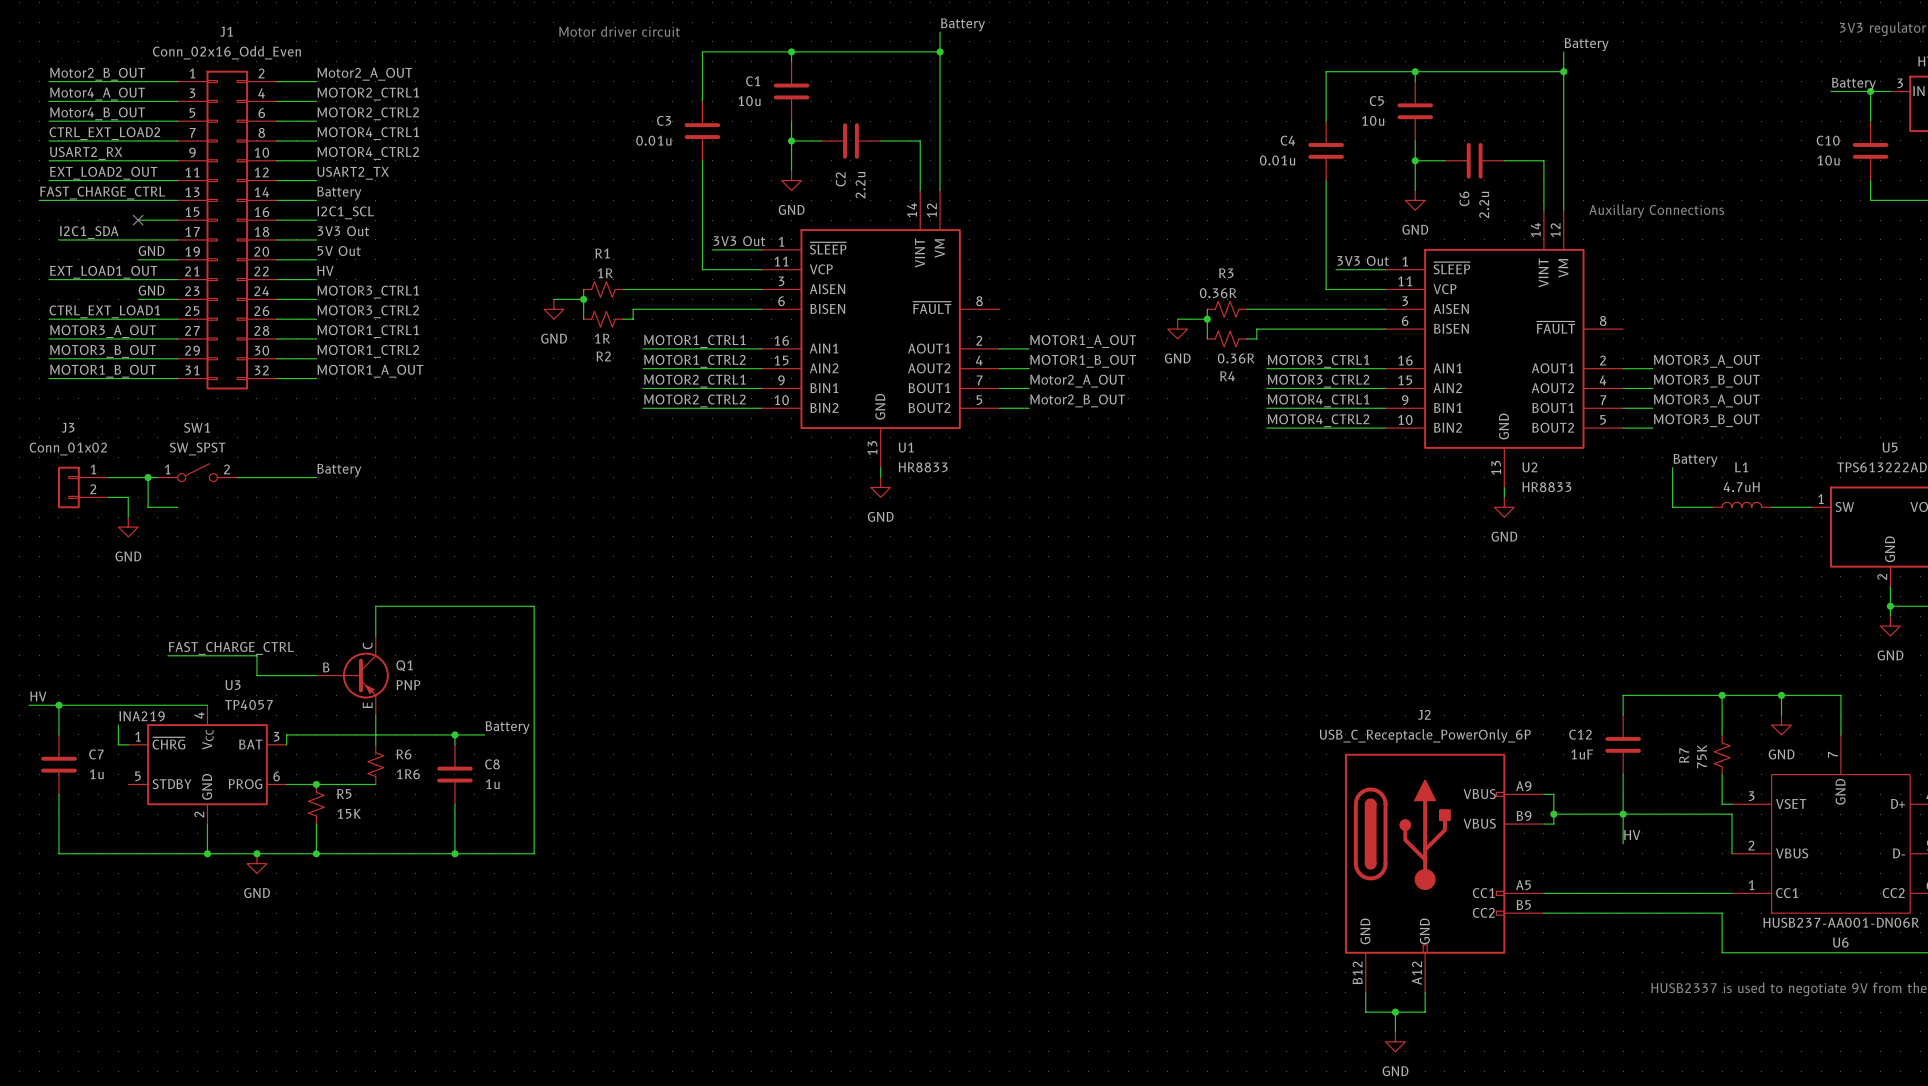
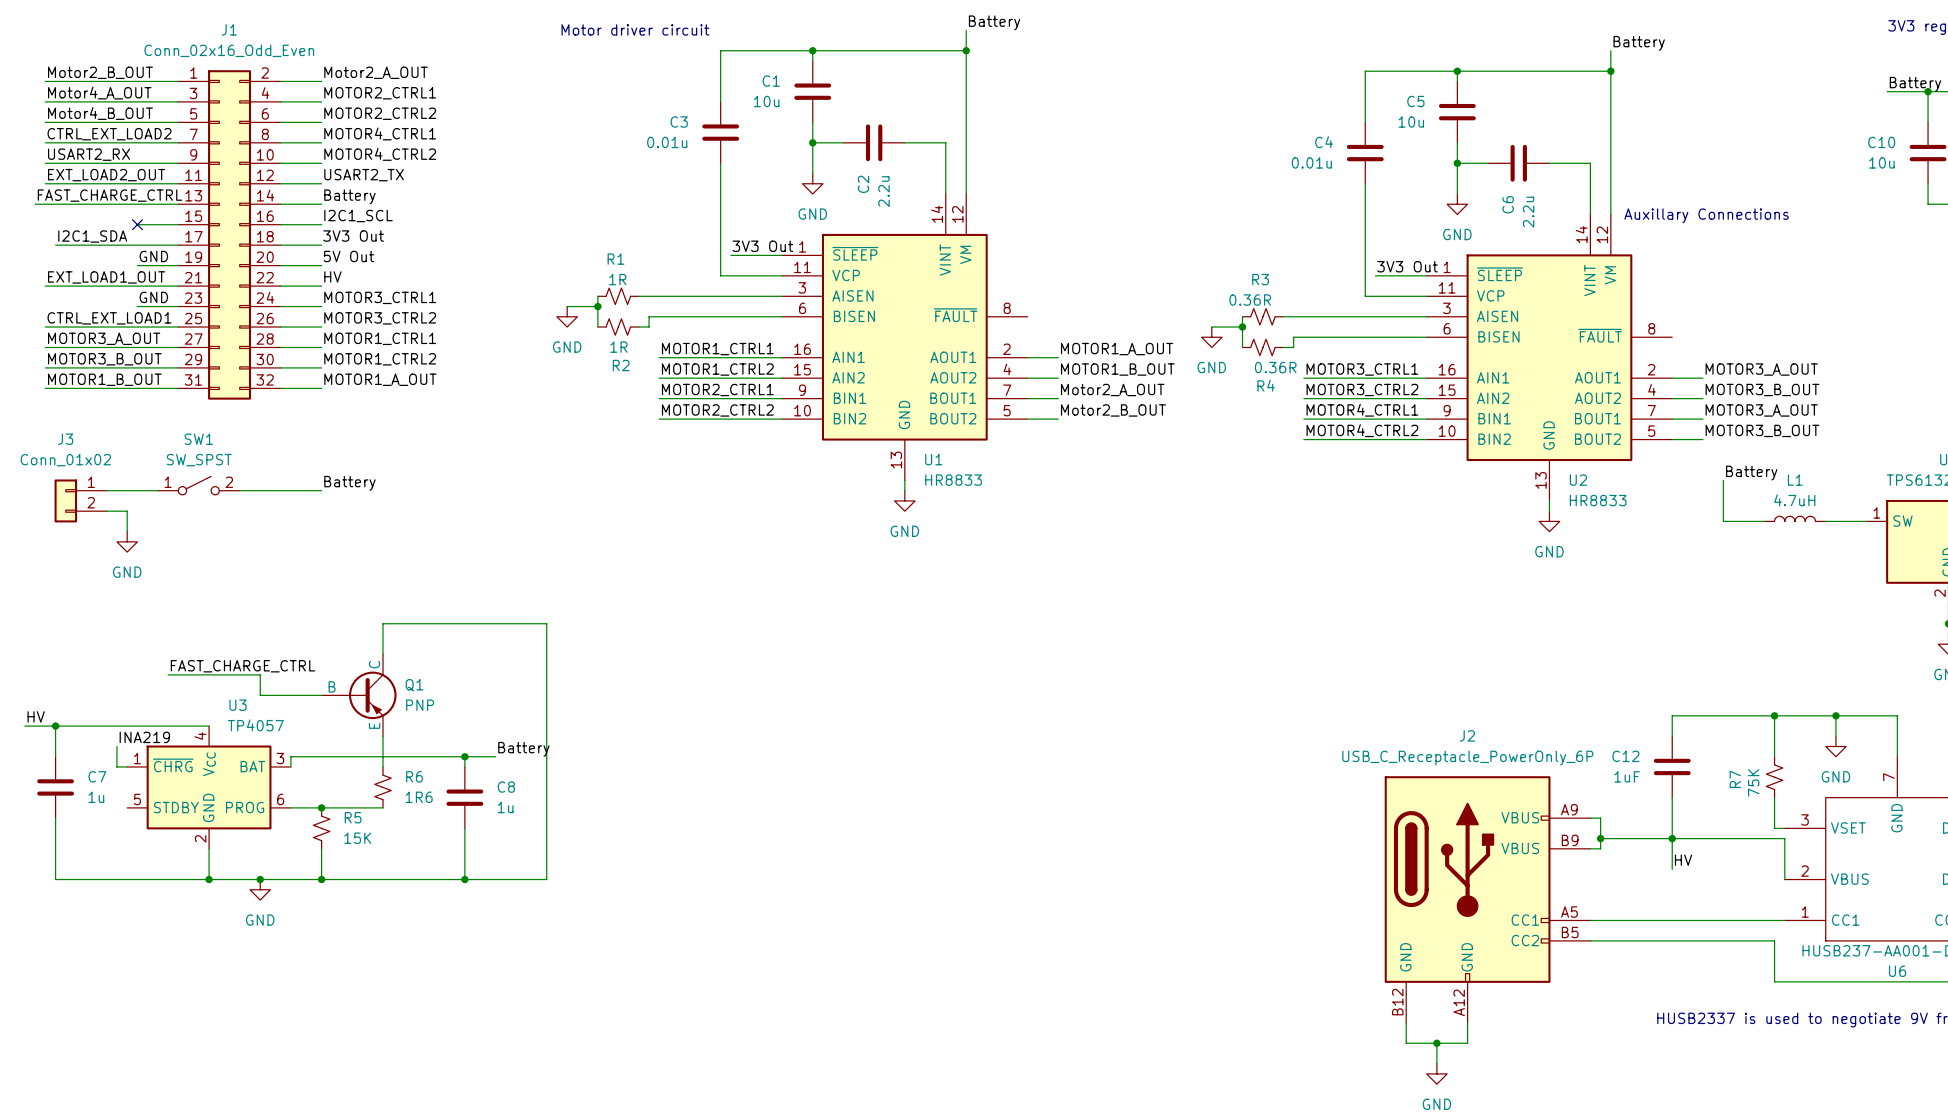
wire: (148, 477) (148, 507) (177, 507) -> none
junction: (148, 477) -> none

